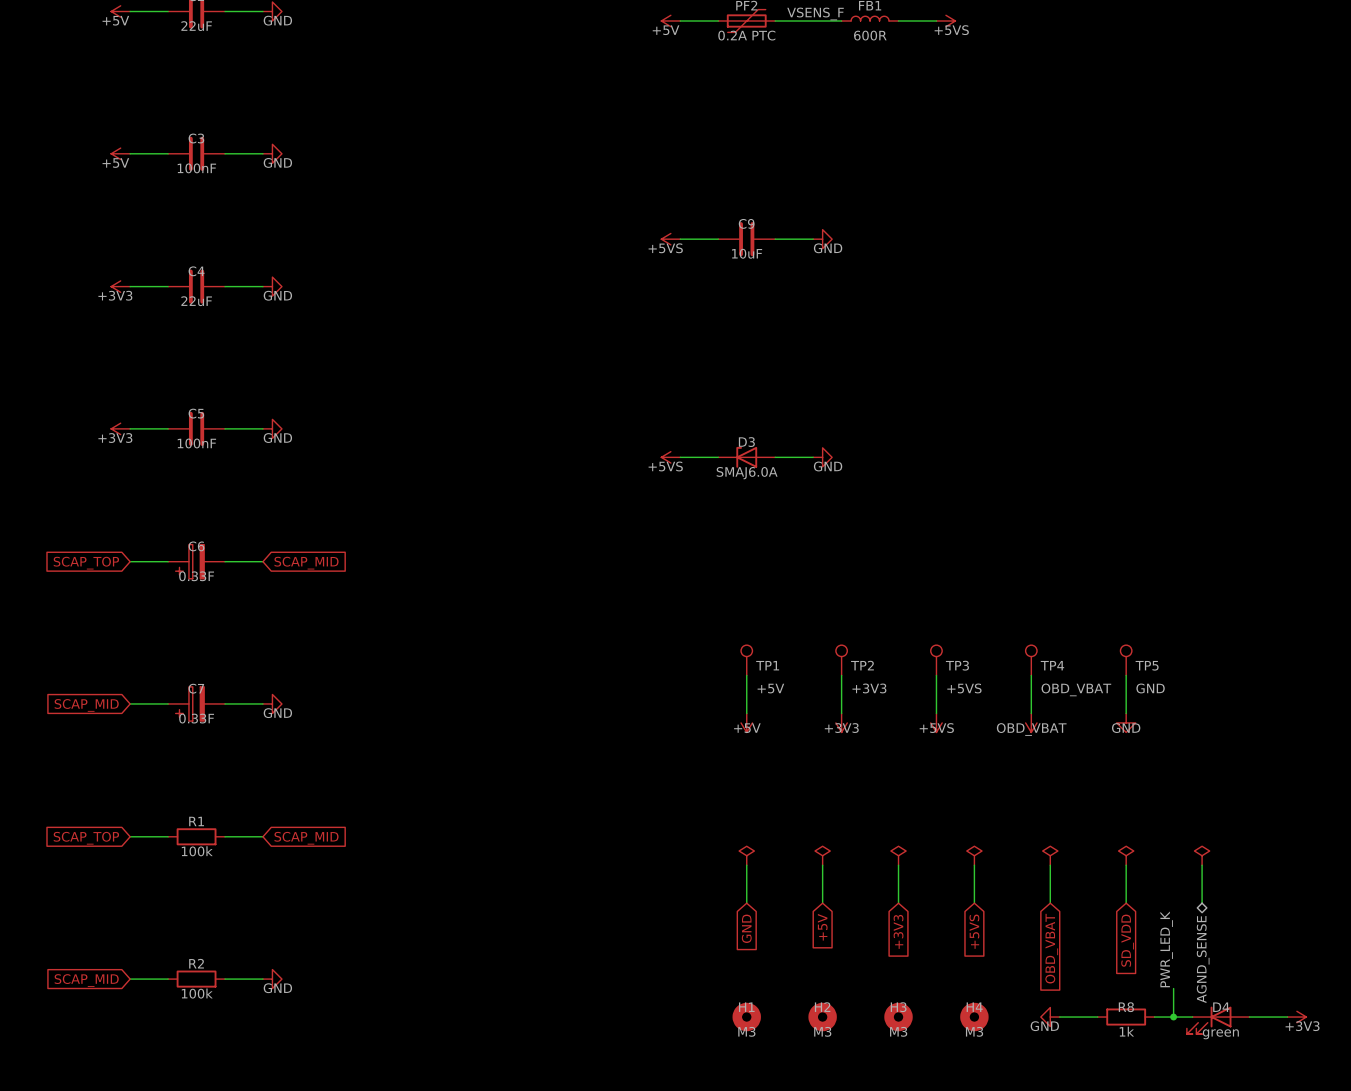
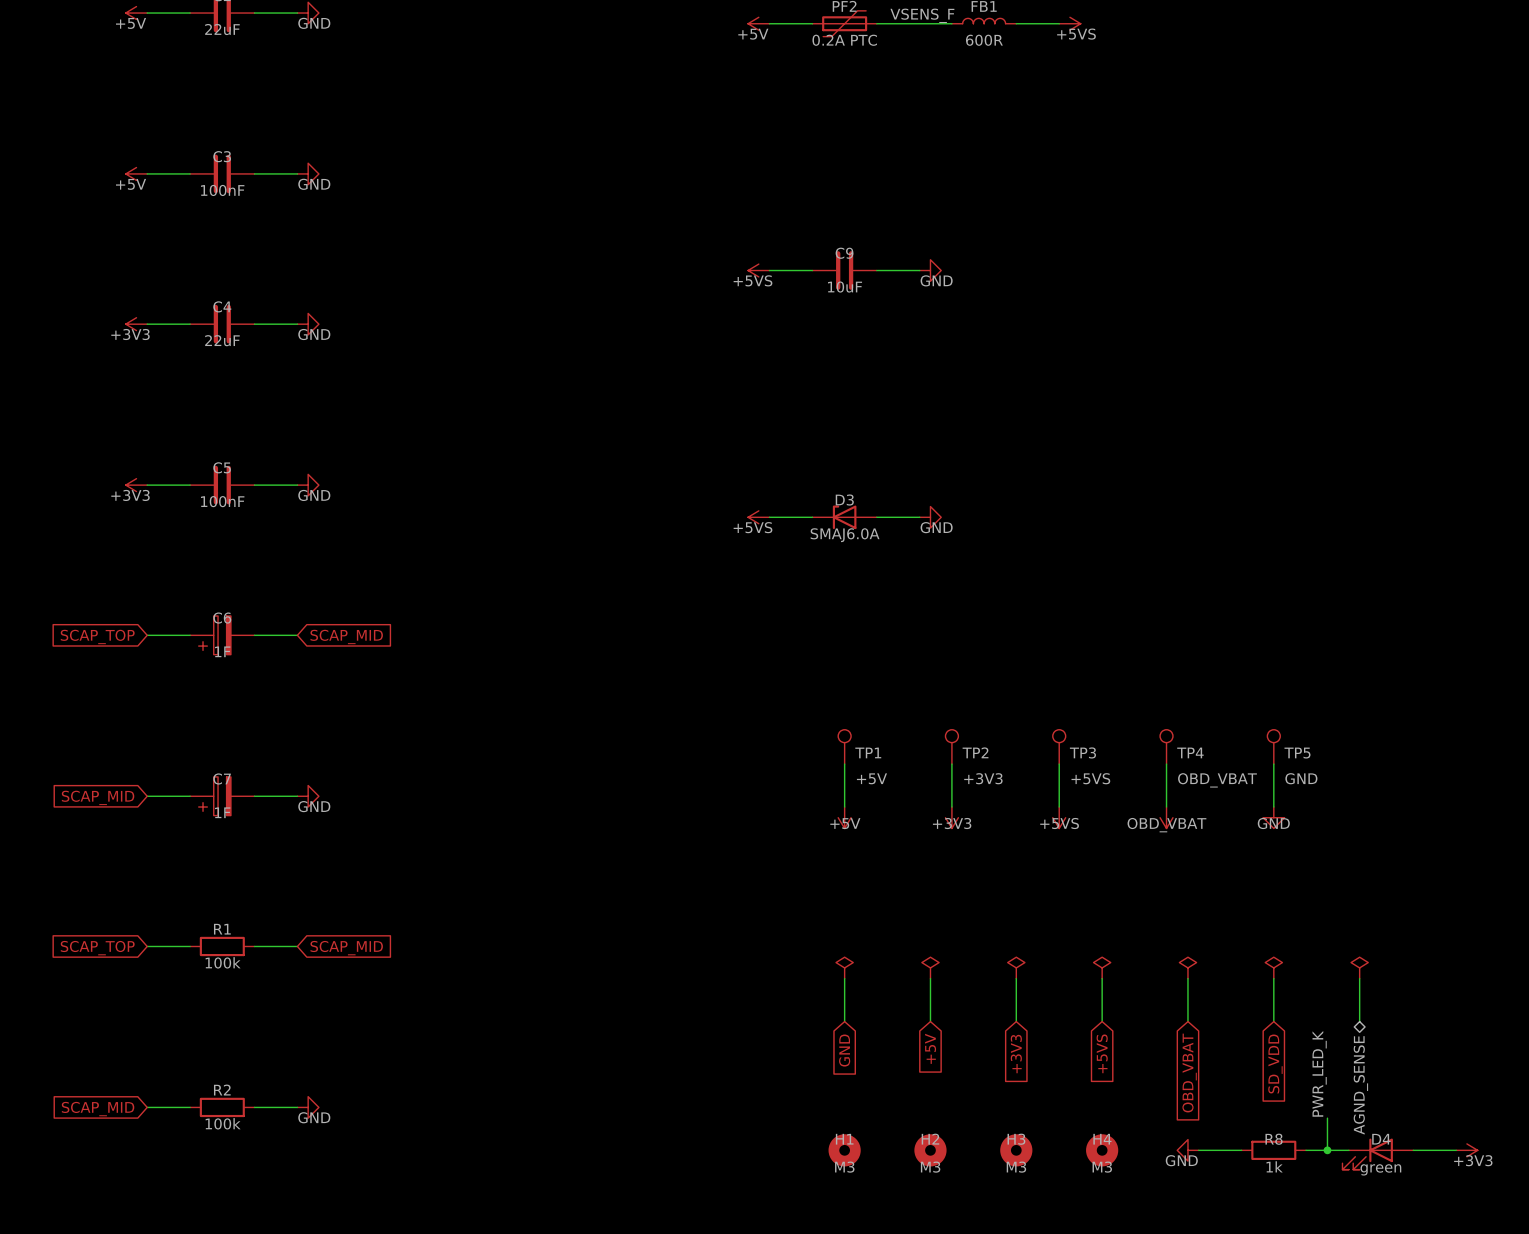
C6 value: 0.33F (196, 576) -> 1F (222, 651)
C7 value: 0.33F (196, 718) -> 1F (222, 812)

